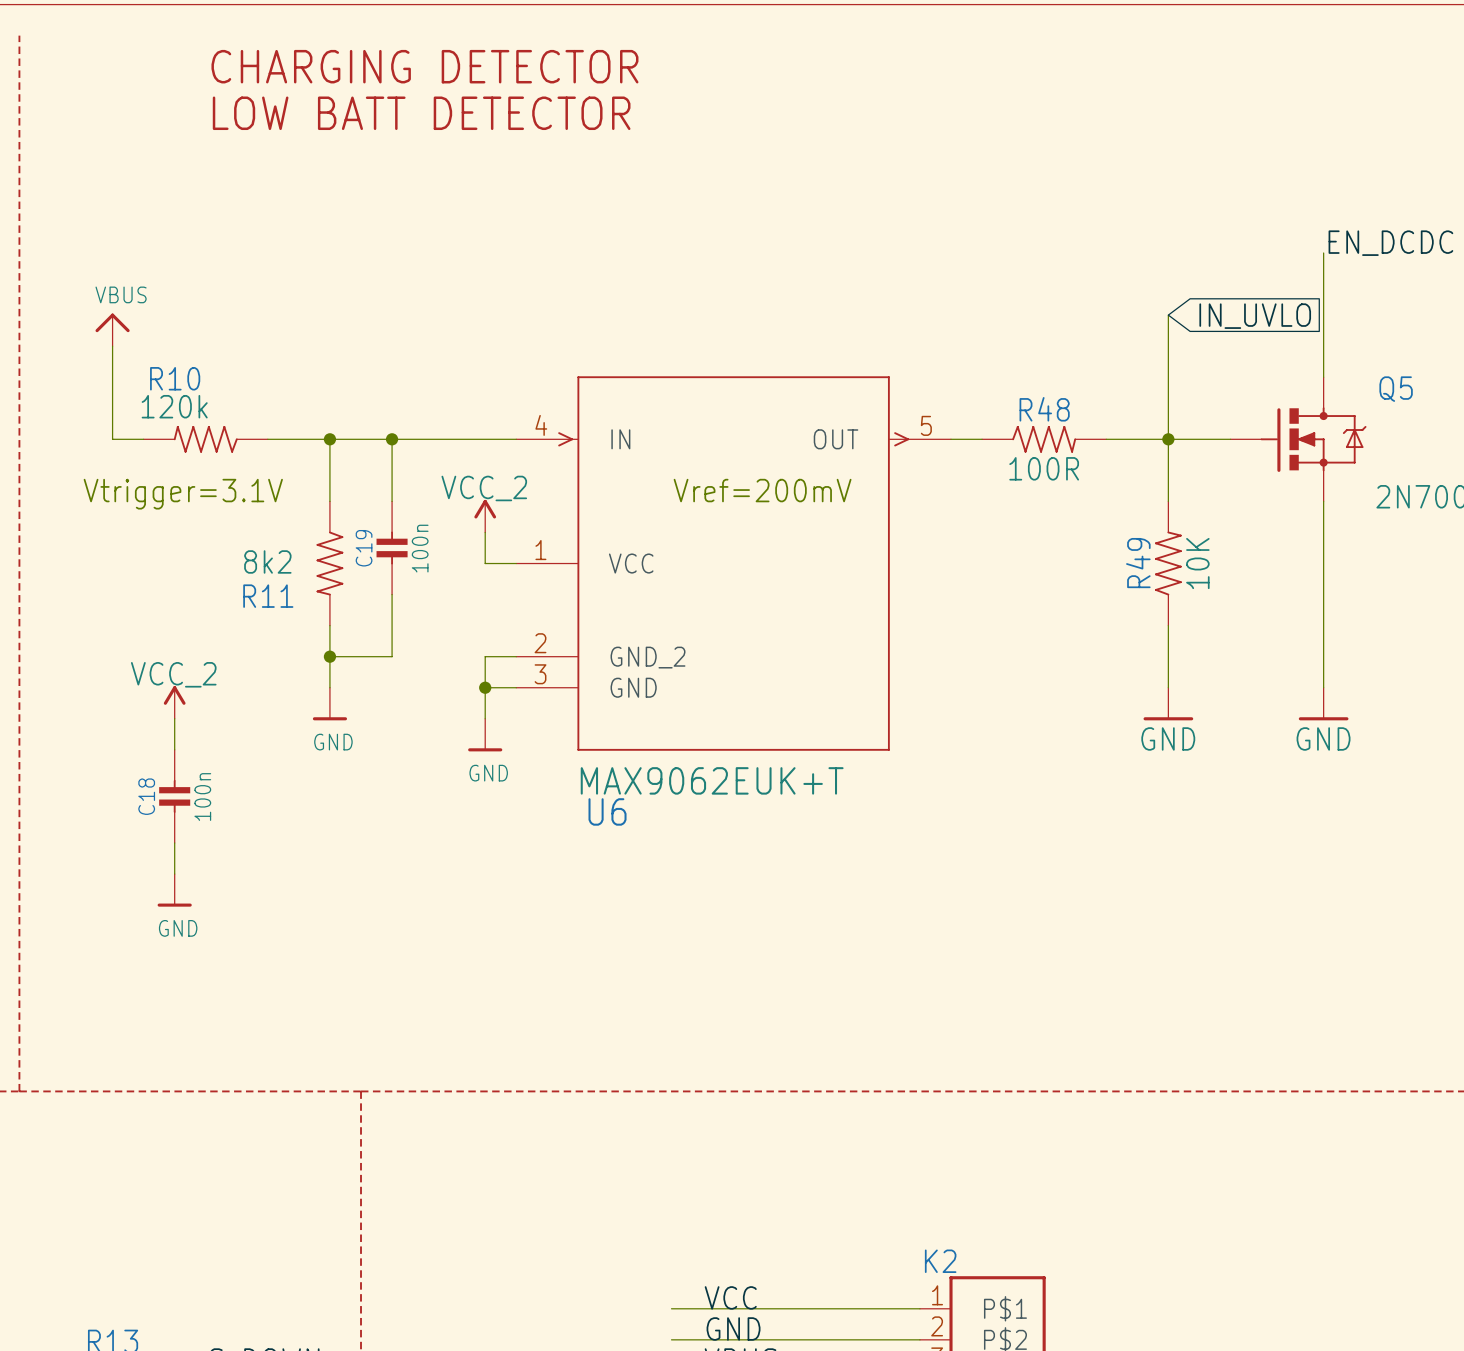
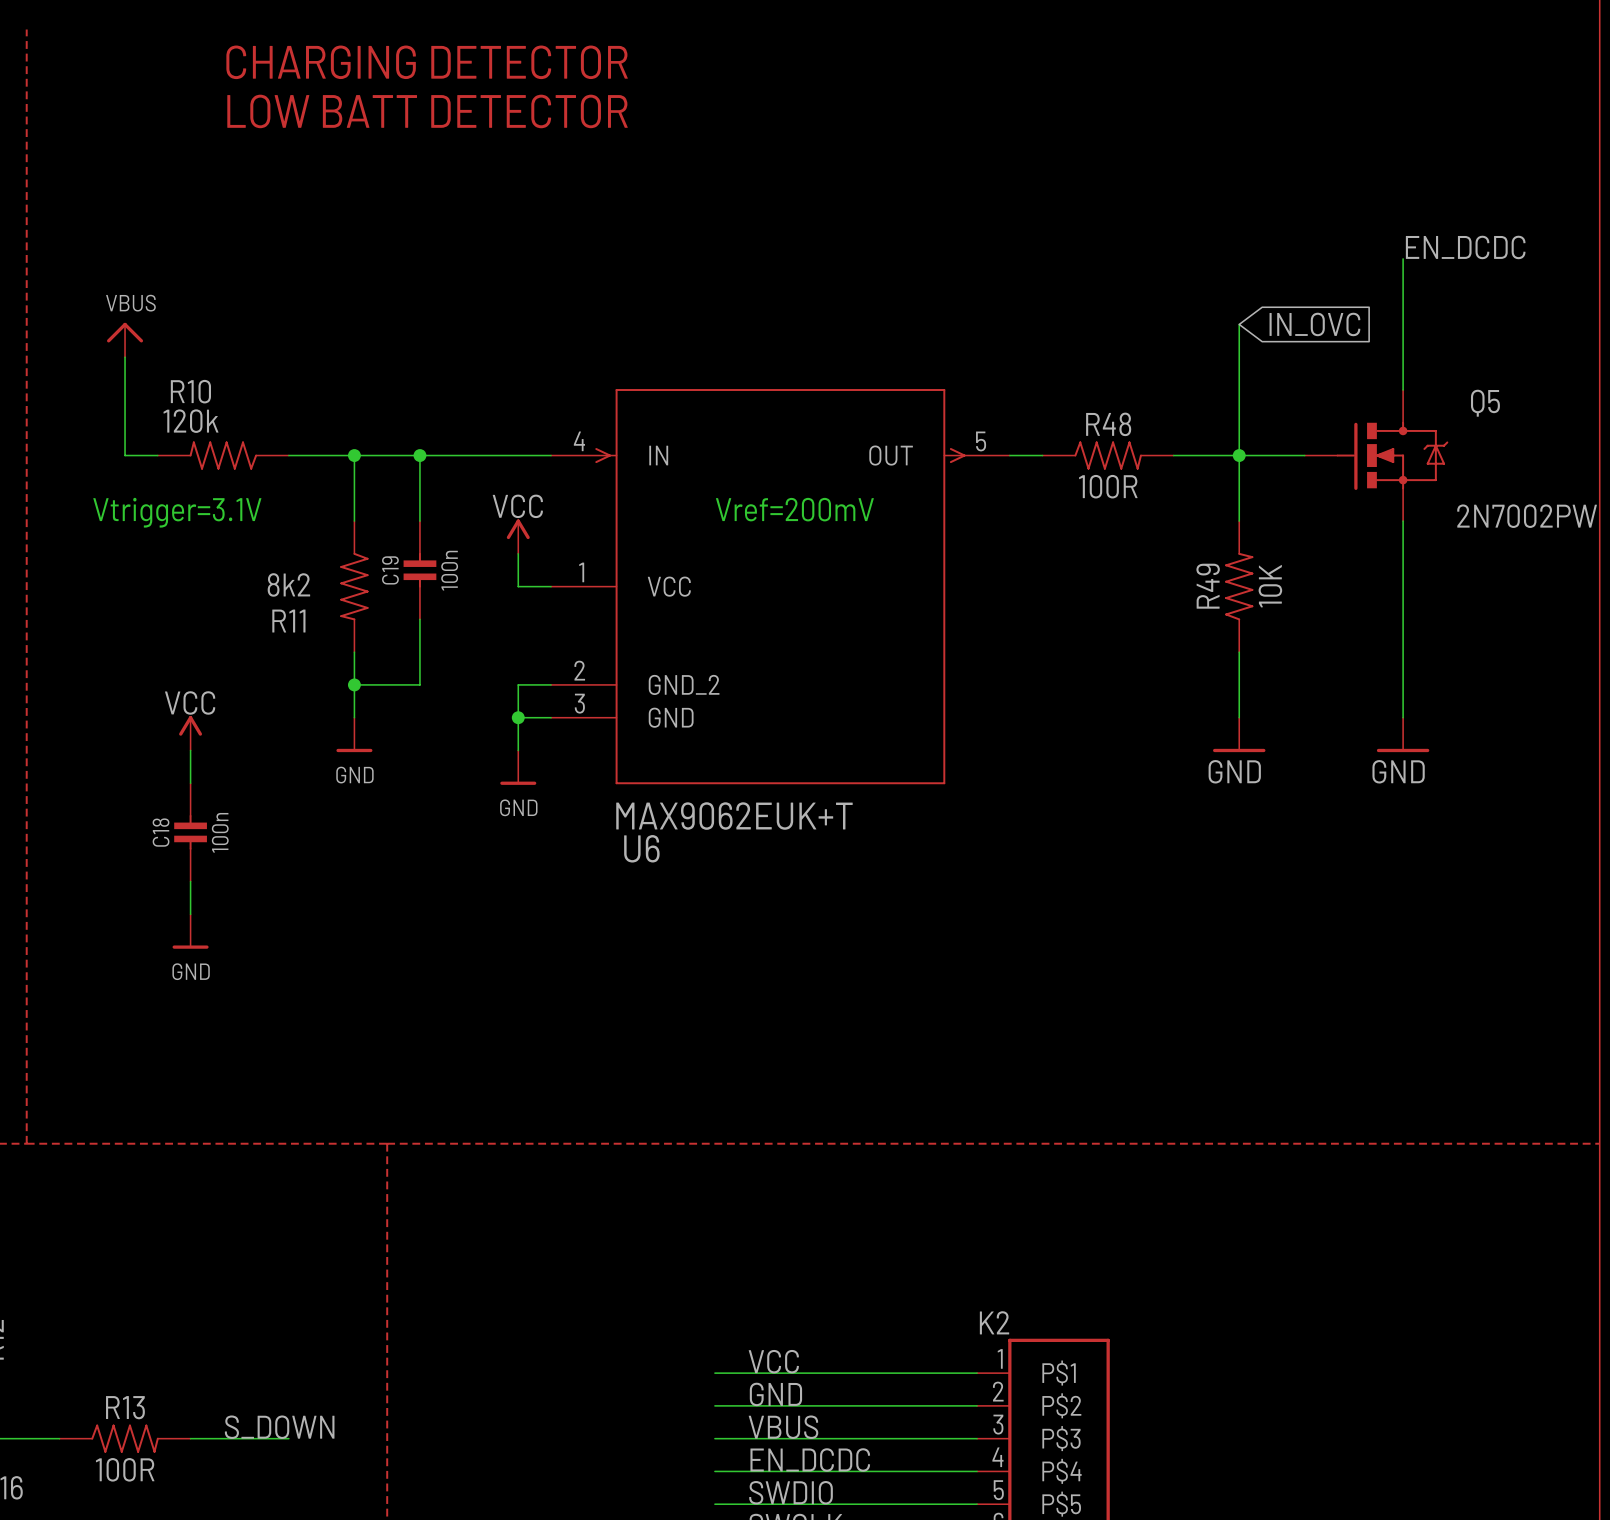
global label: IN_UVLO (1255, 316) -> IN_OVC (1314, 324)
power symbol: VCC_2 (485, 516) -> VCC (518, 536)
power symbol: VCC_2 (174, 702) -> VCC (190, 733)

